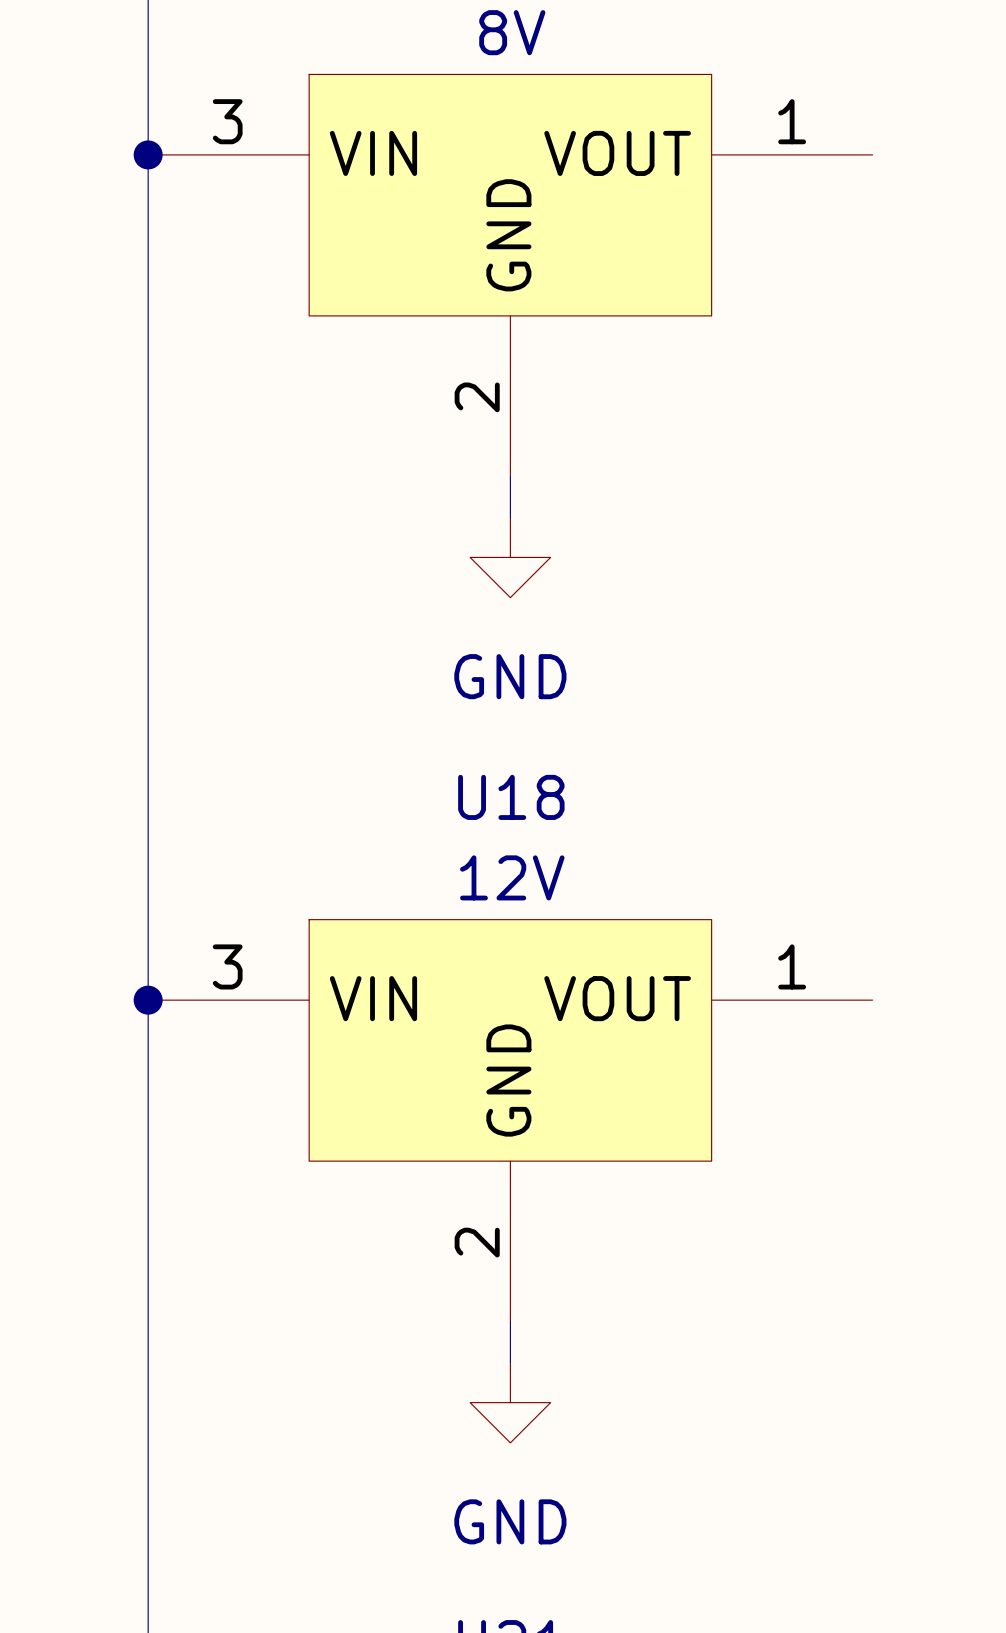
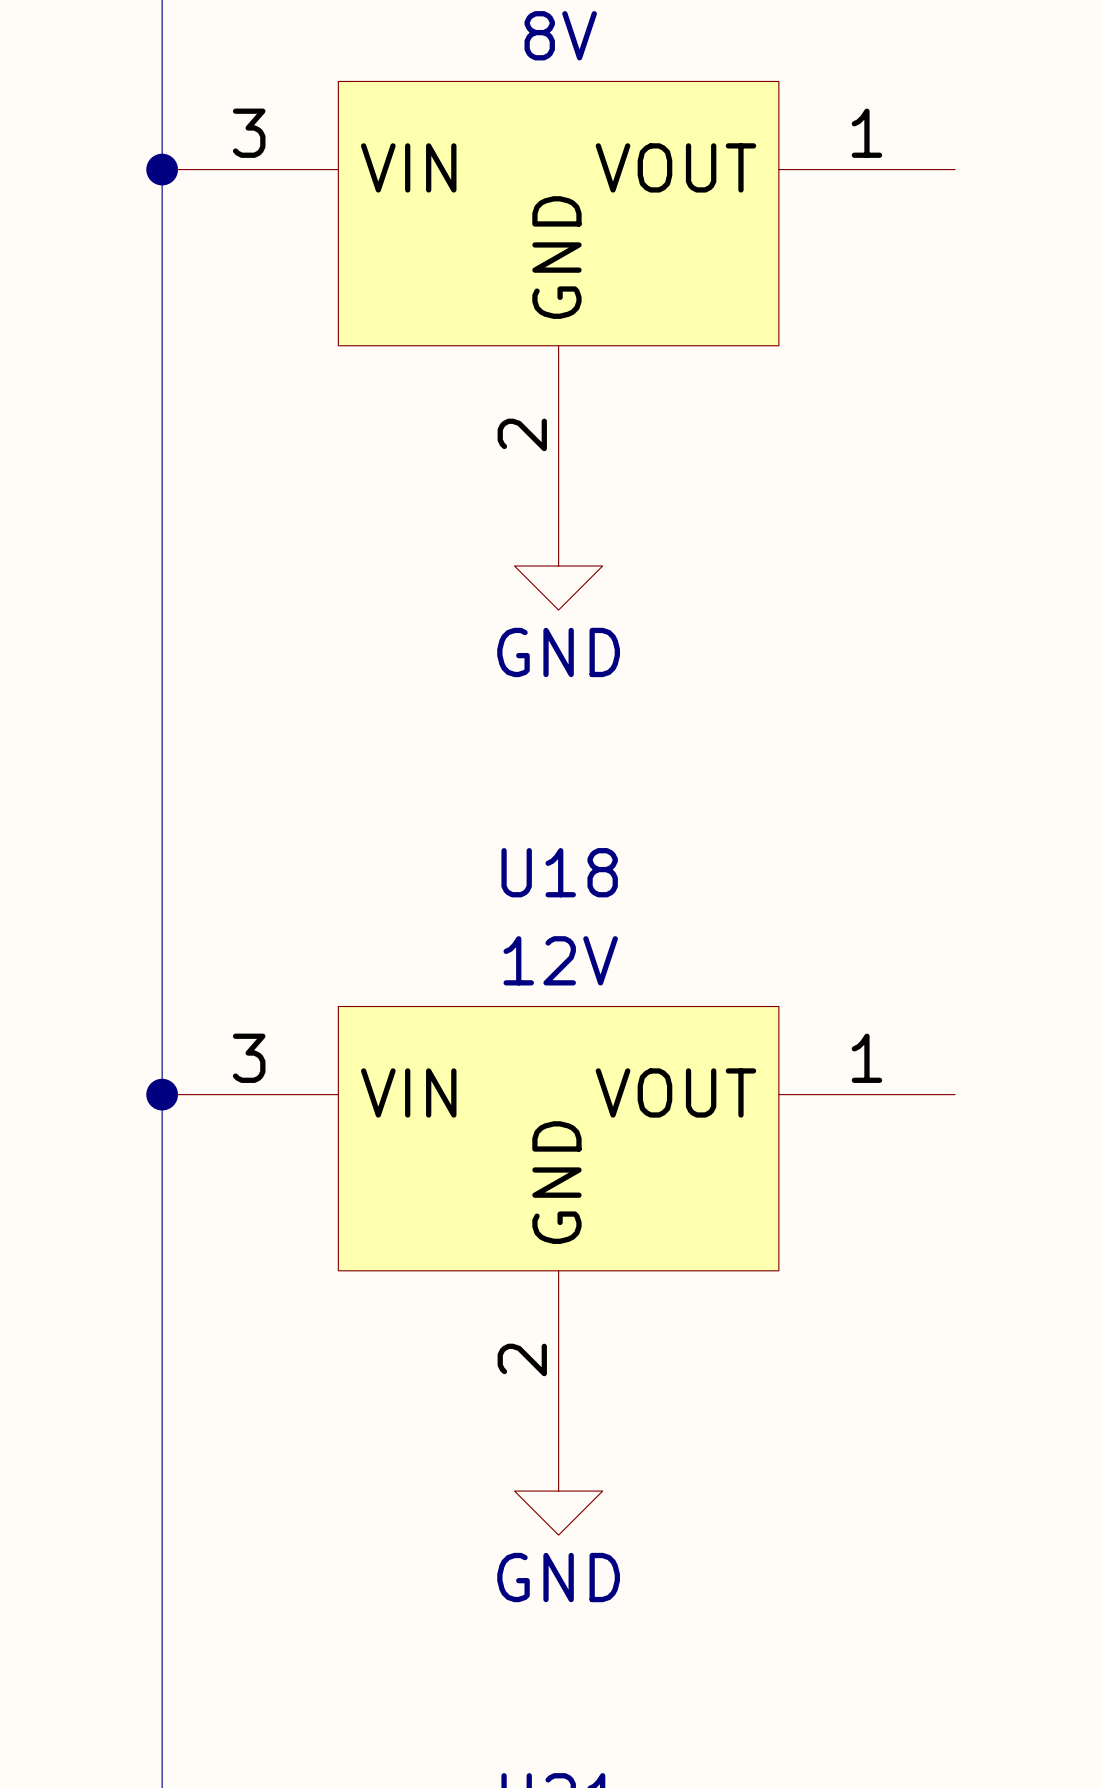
power symbol position: GND (510, 557) -> GND (558, 566)
power symbol text position: GND (510, 676) -> GND (558, 652)
power symbol position: GND (510, 1402) -> GND (558, 1491)
power symbol text position: GND (510, 1521) -> GND (558, 1577)

